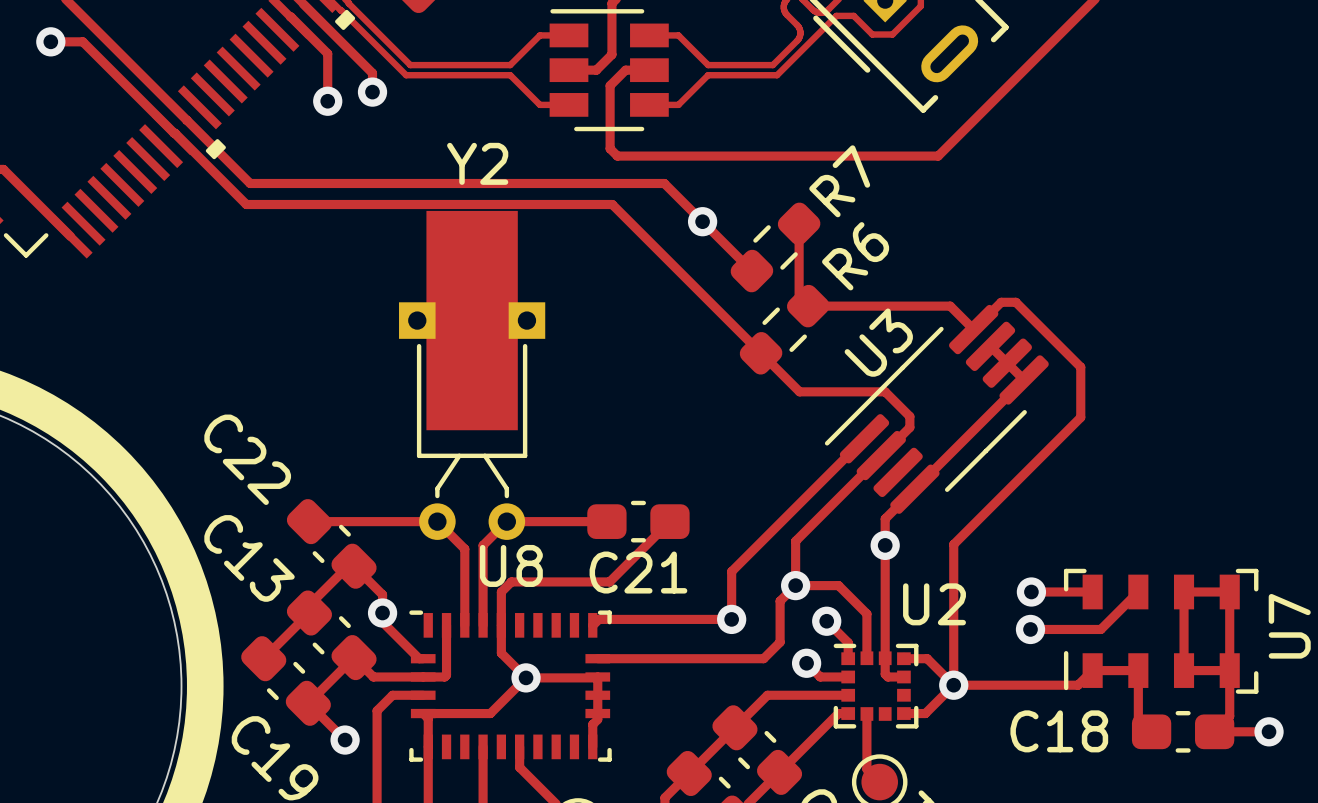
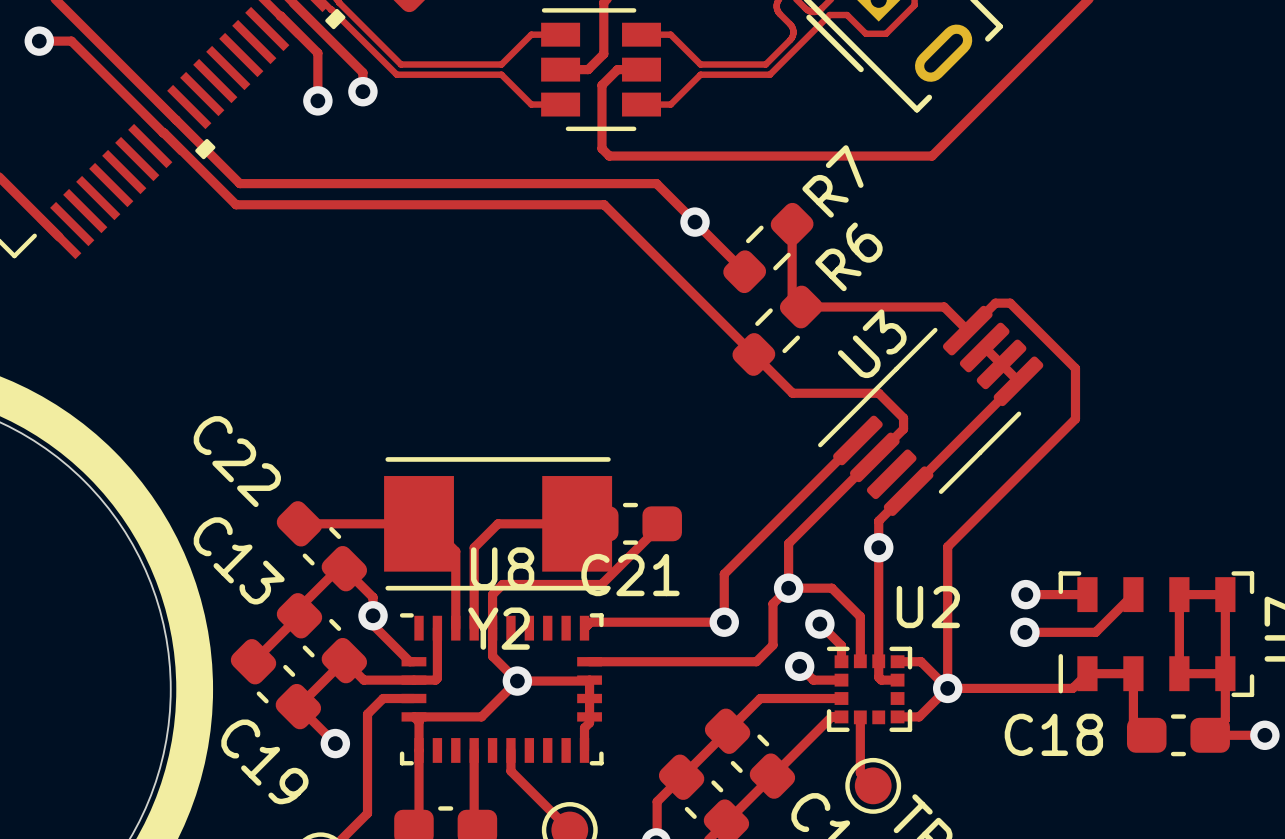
Y2 name position: Y2 (477, 163) -> Y2 (499, 628)
Y2 footprint: [399, 210, 546, 540] -> [384, 457, 613, 591]

